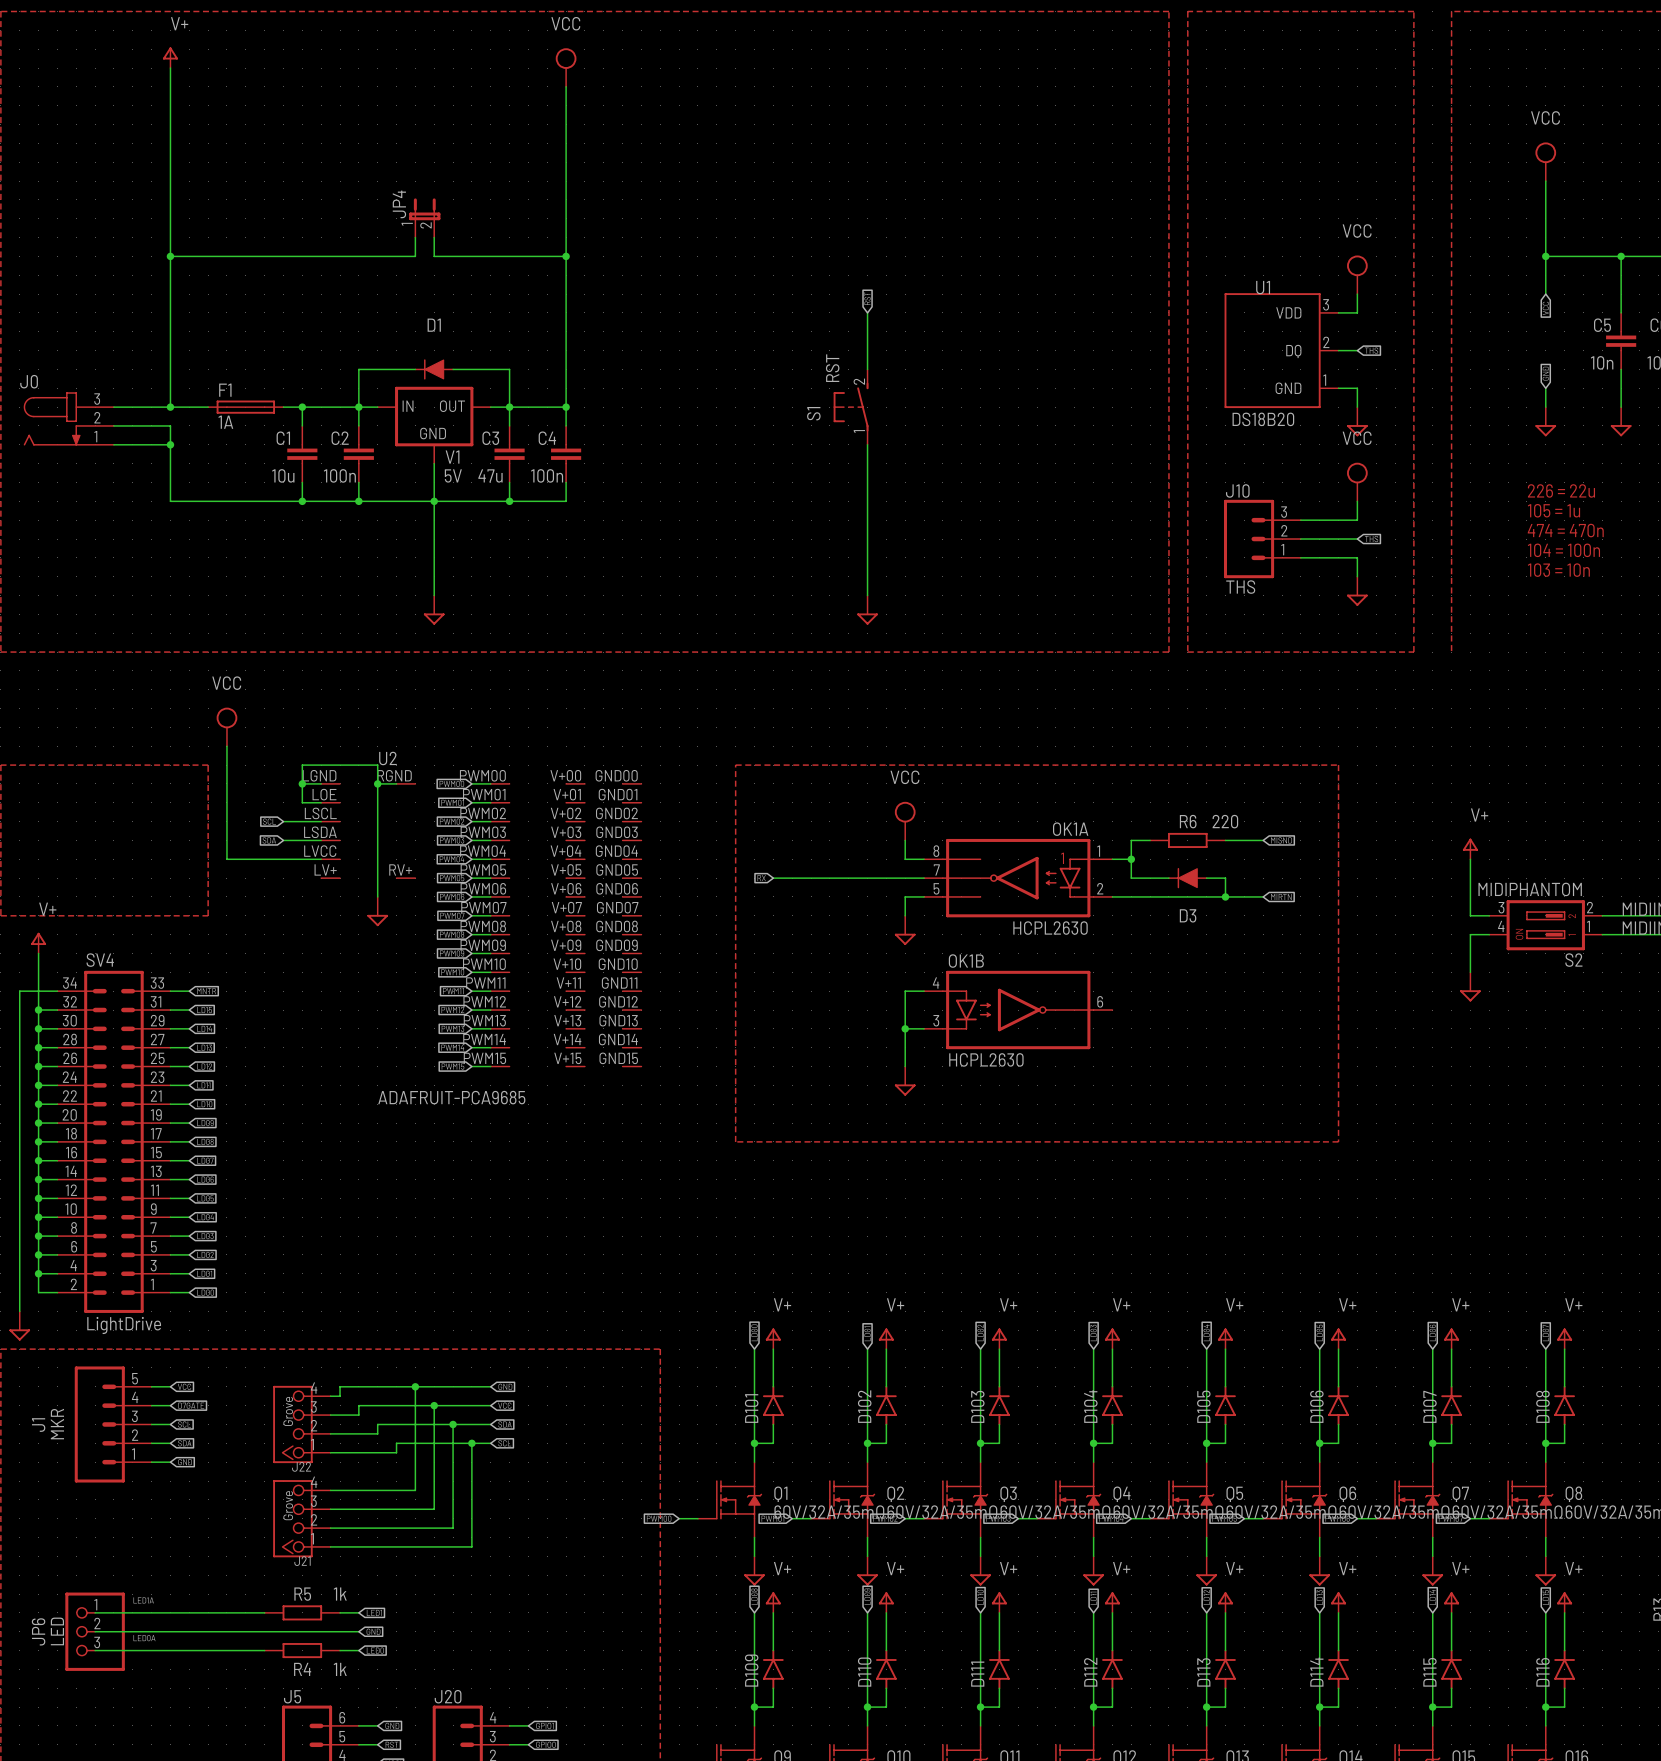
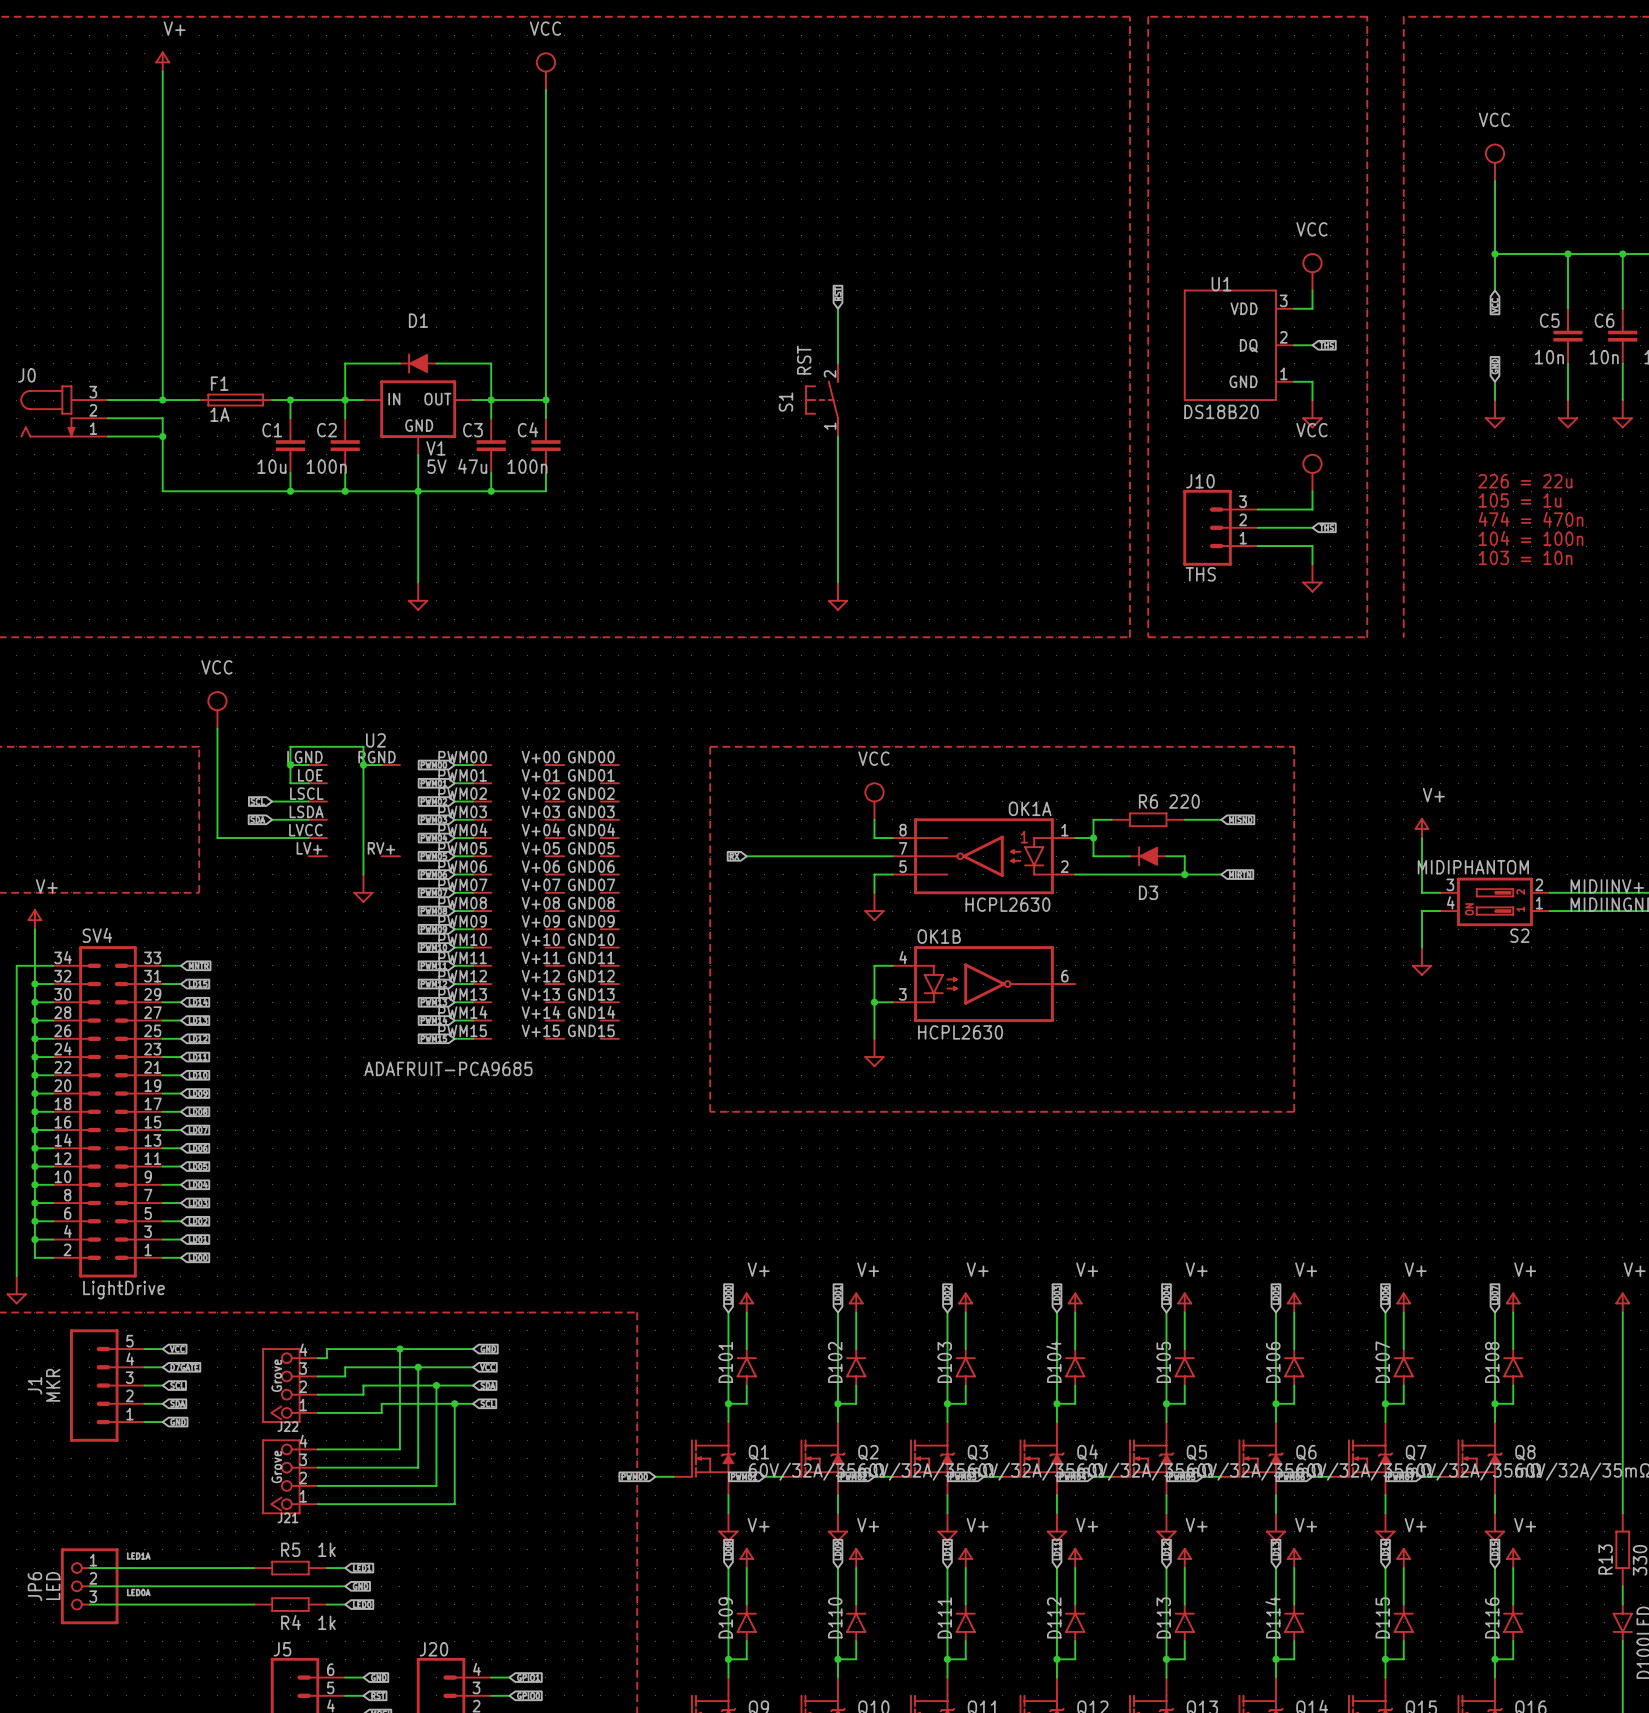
JP4: (424, 217) -> none
wire: (415, 237) (415, 256) (170, 256) -> none
wire: (434, 237) (434, 256) (566, 256) -> none
junction: (170, 256) -> none
junction: (566, 256) -> none

